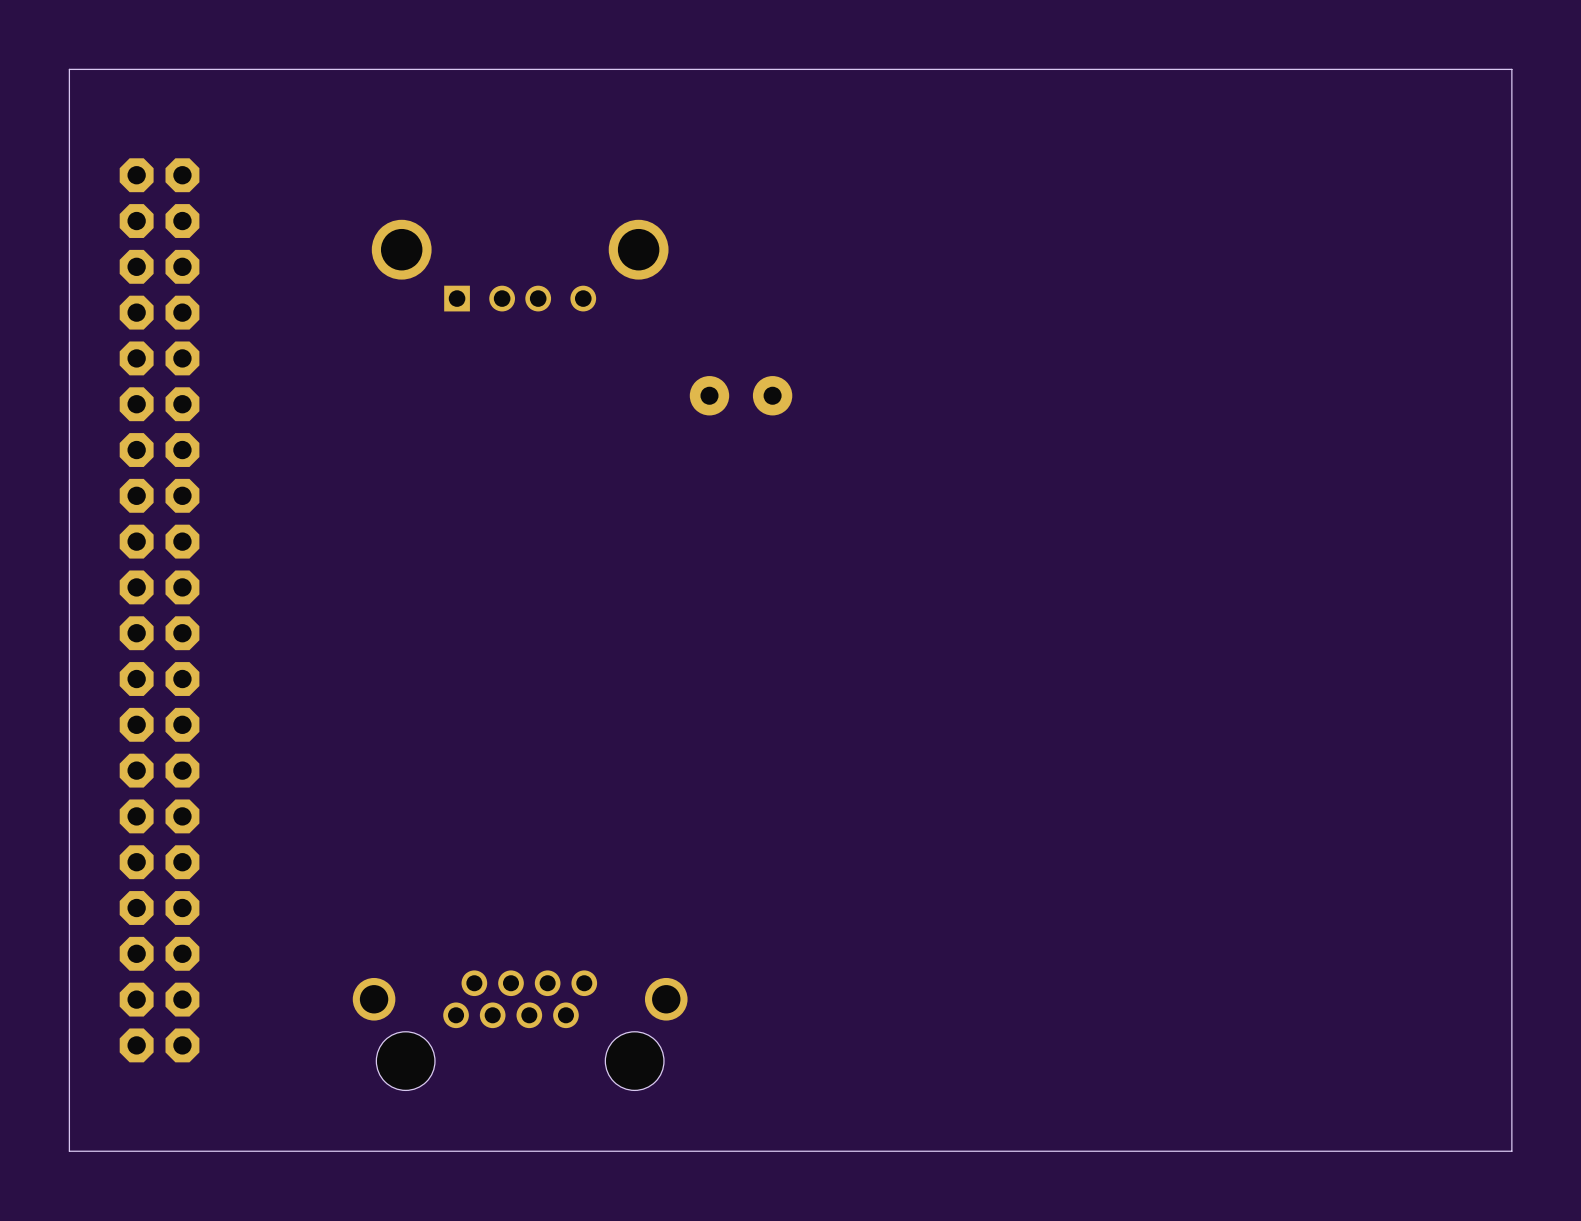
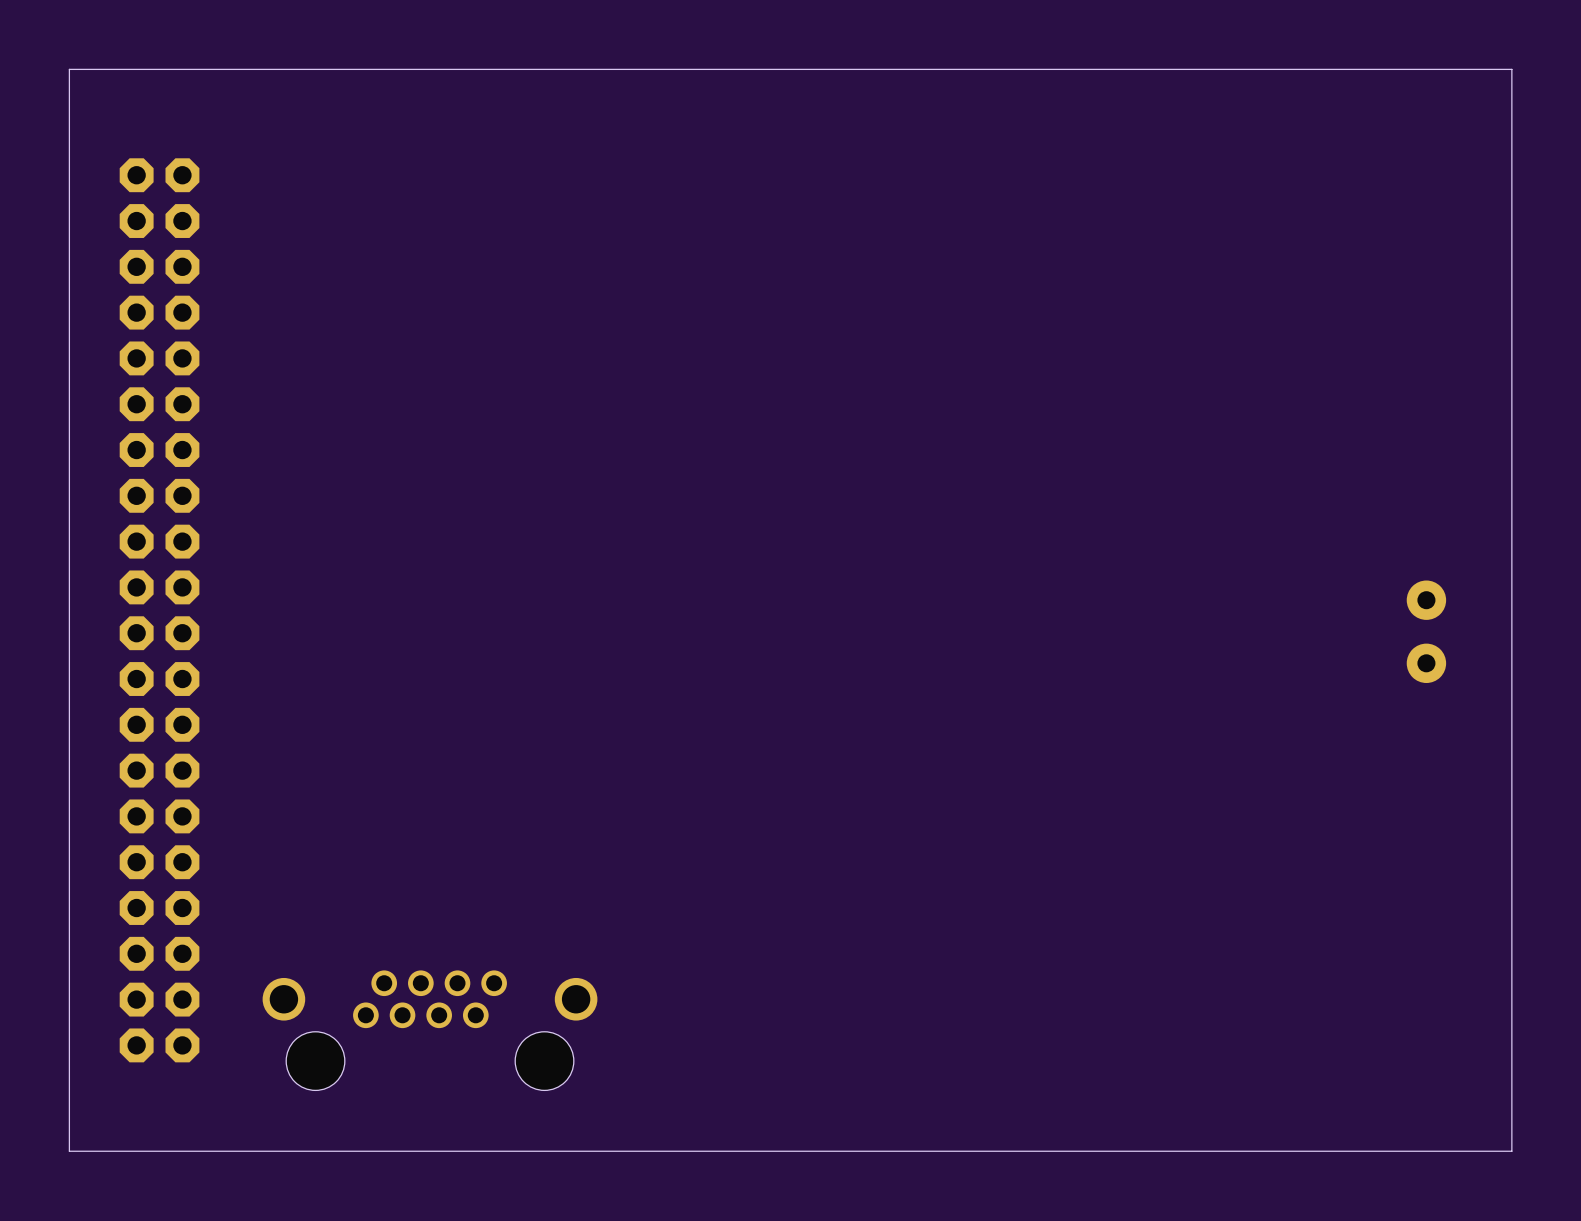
part: (520, 265) -> none
part: (741, 395) -> none
part: none -> (1426, 631)
part position: (520, 1030) -> (430, 1030)

